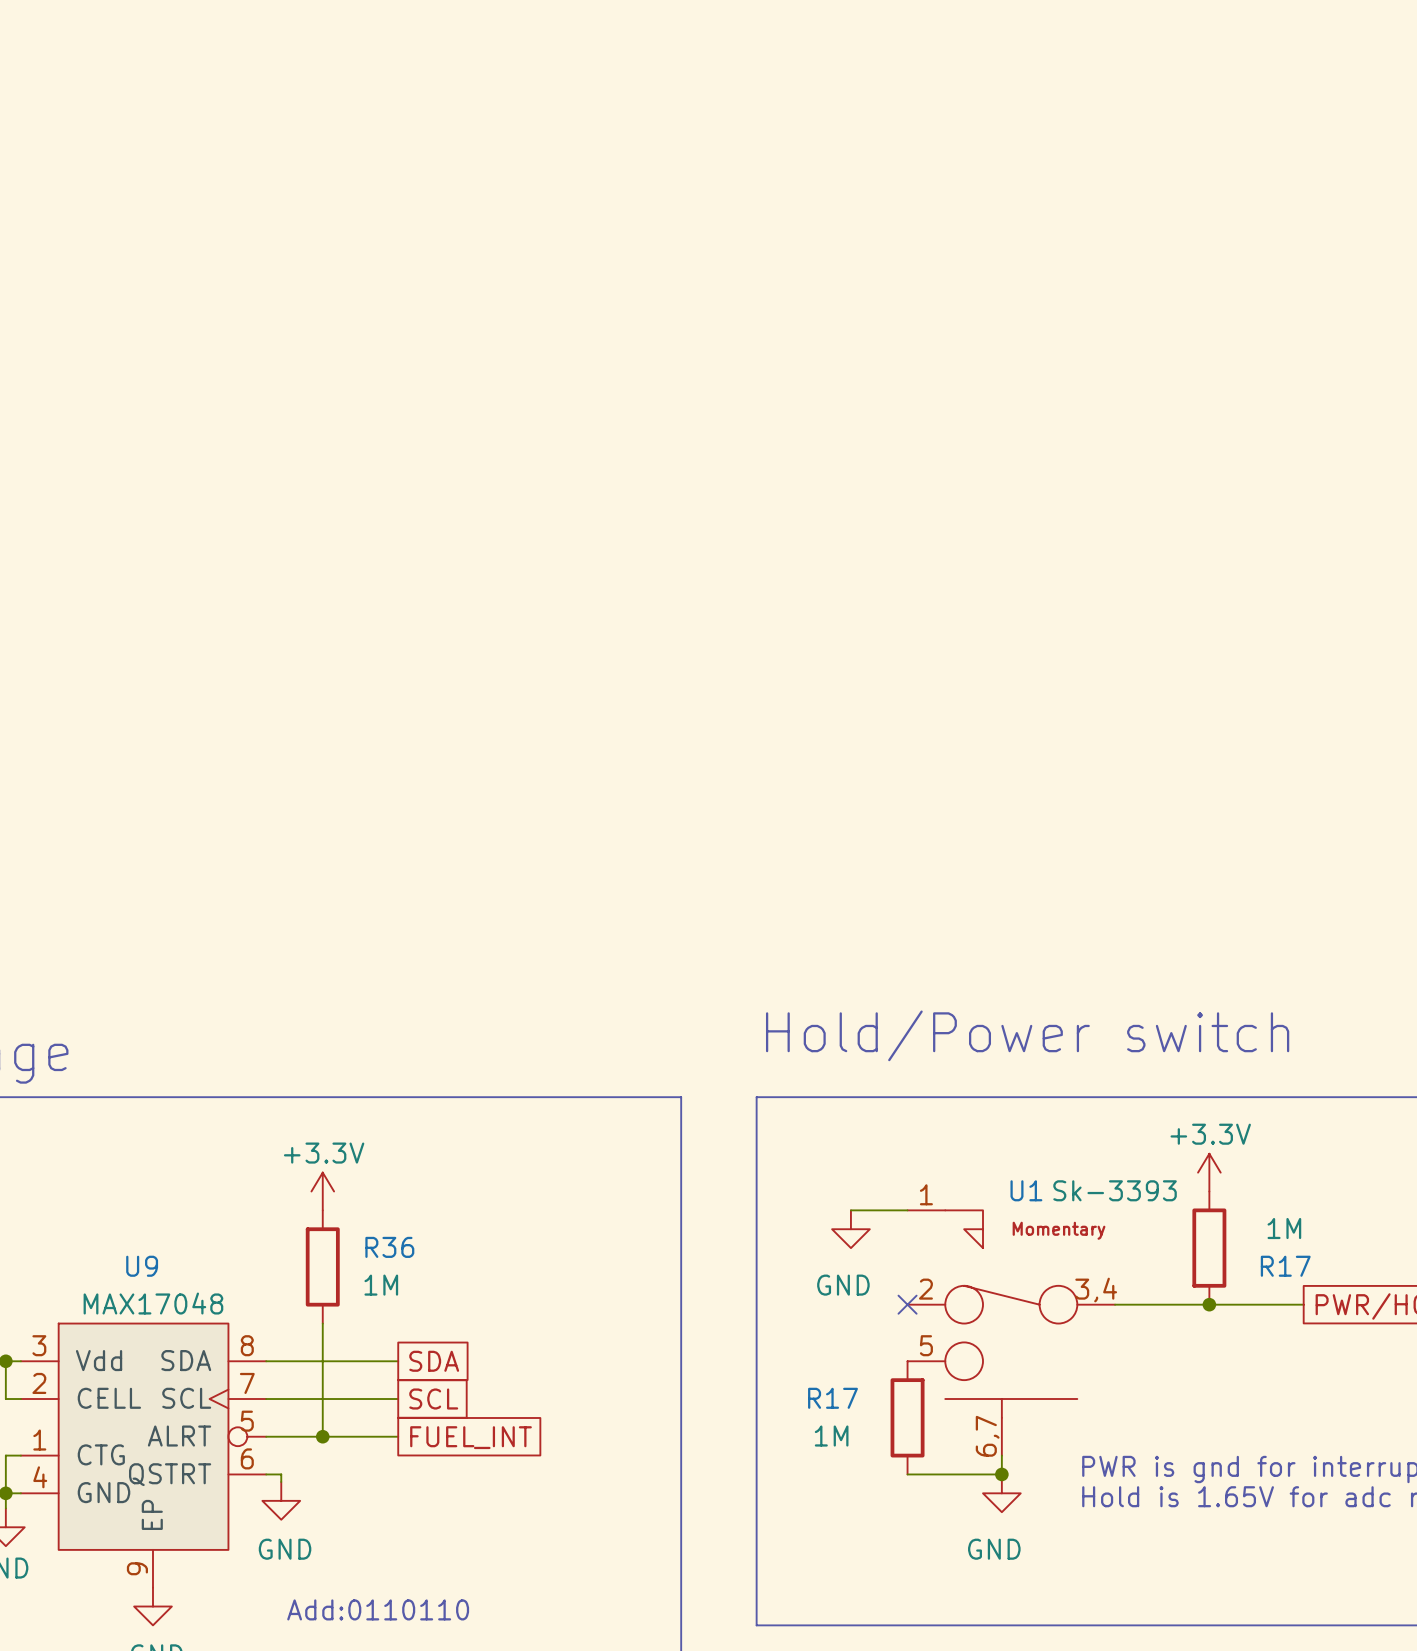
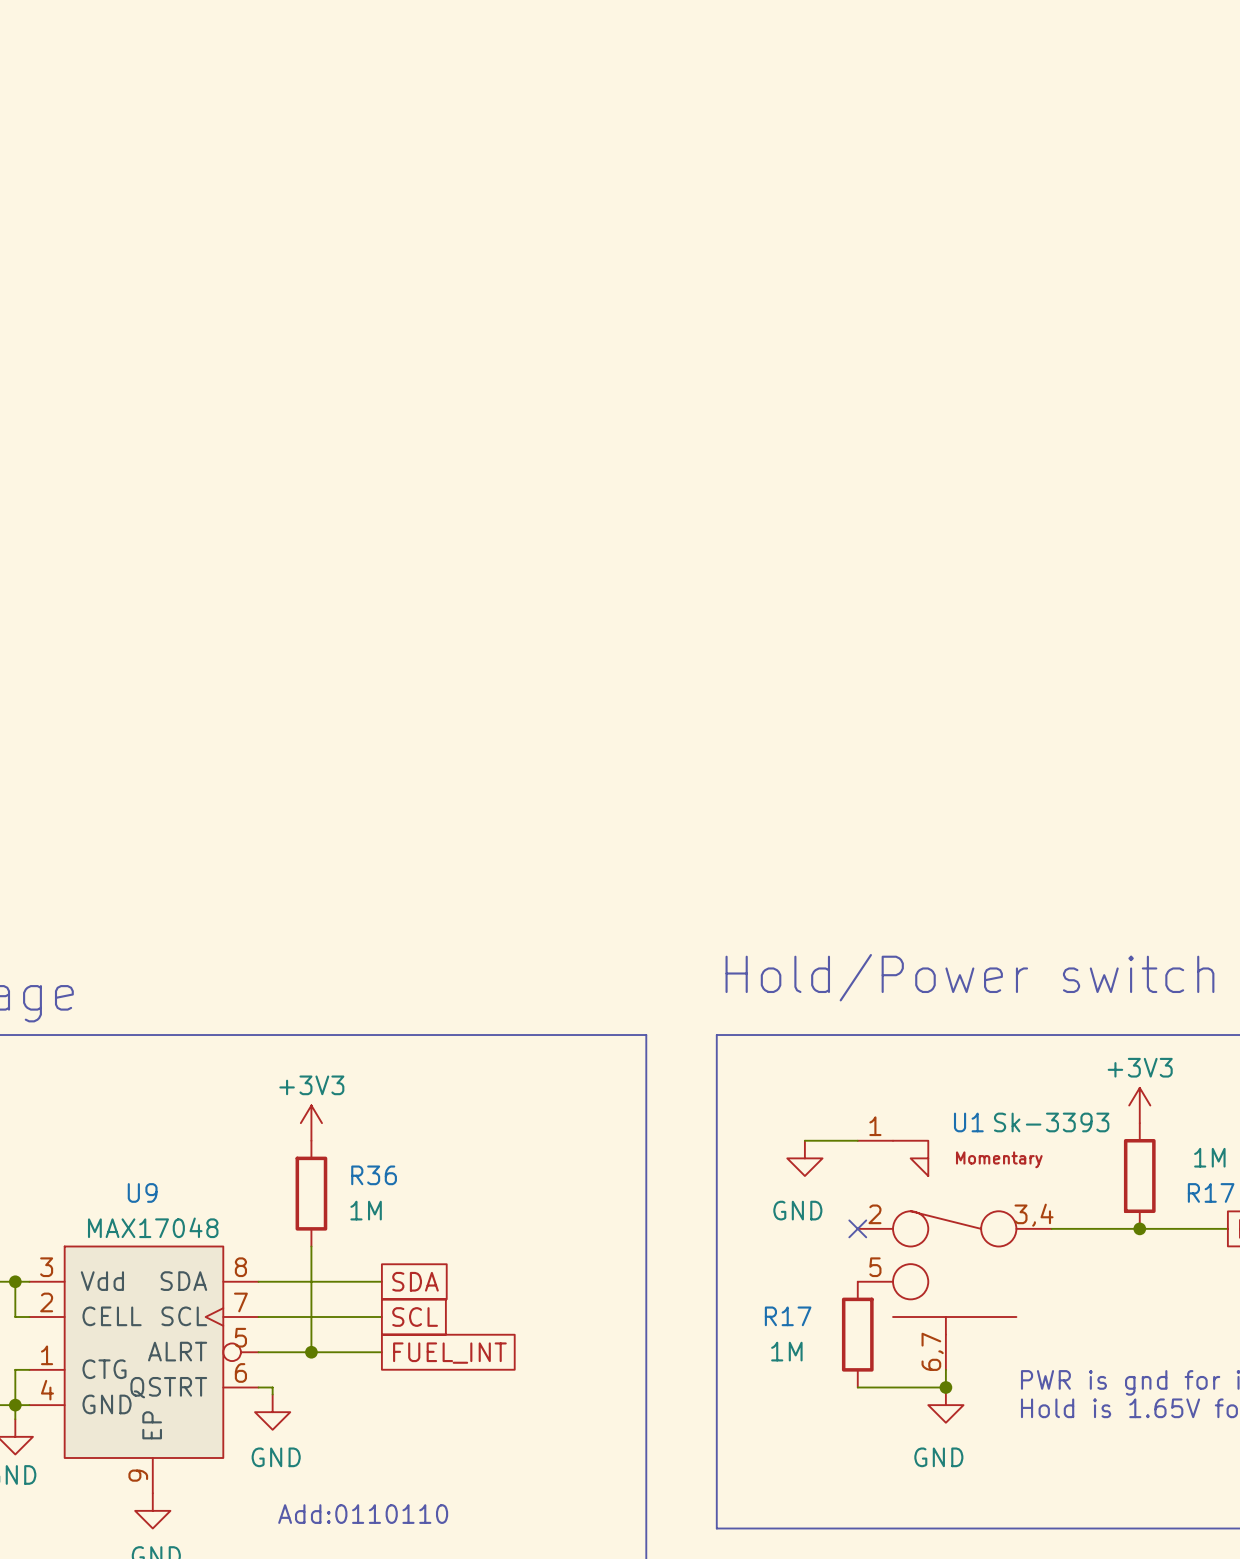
power symbol: +3.3V (1209, 1172) -> +3V3 (1139, 1105)
power symbol: +3.3V (322, 1191) -> +3V3 (311, 1123)

